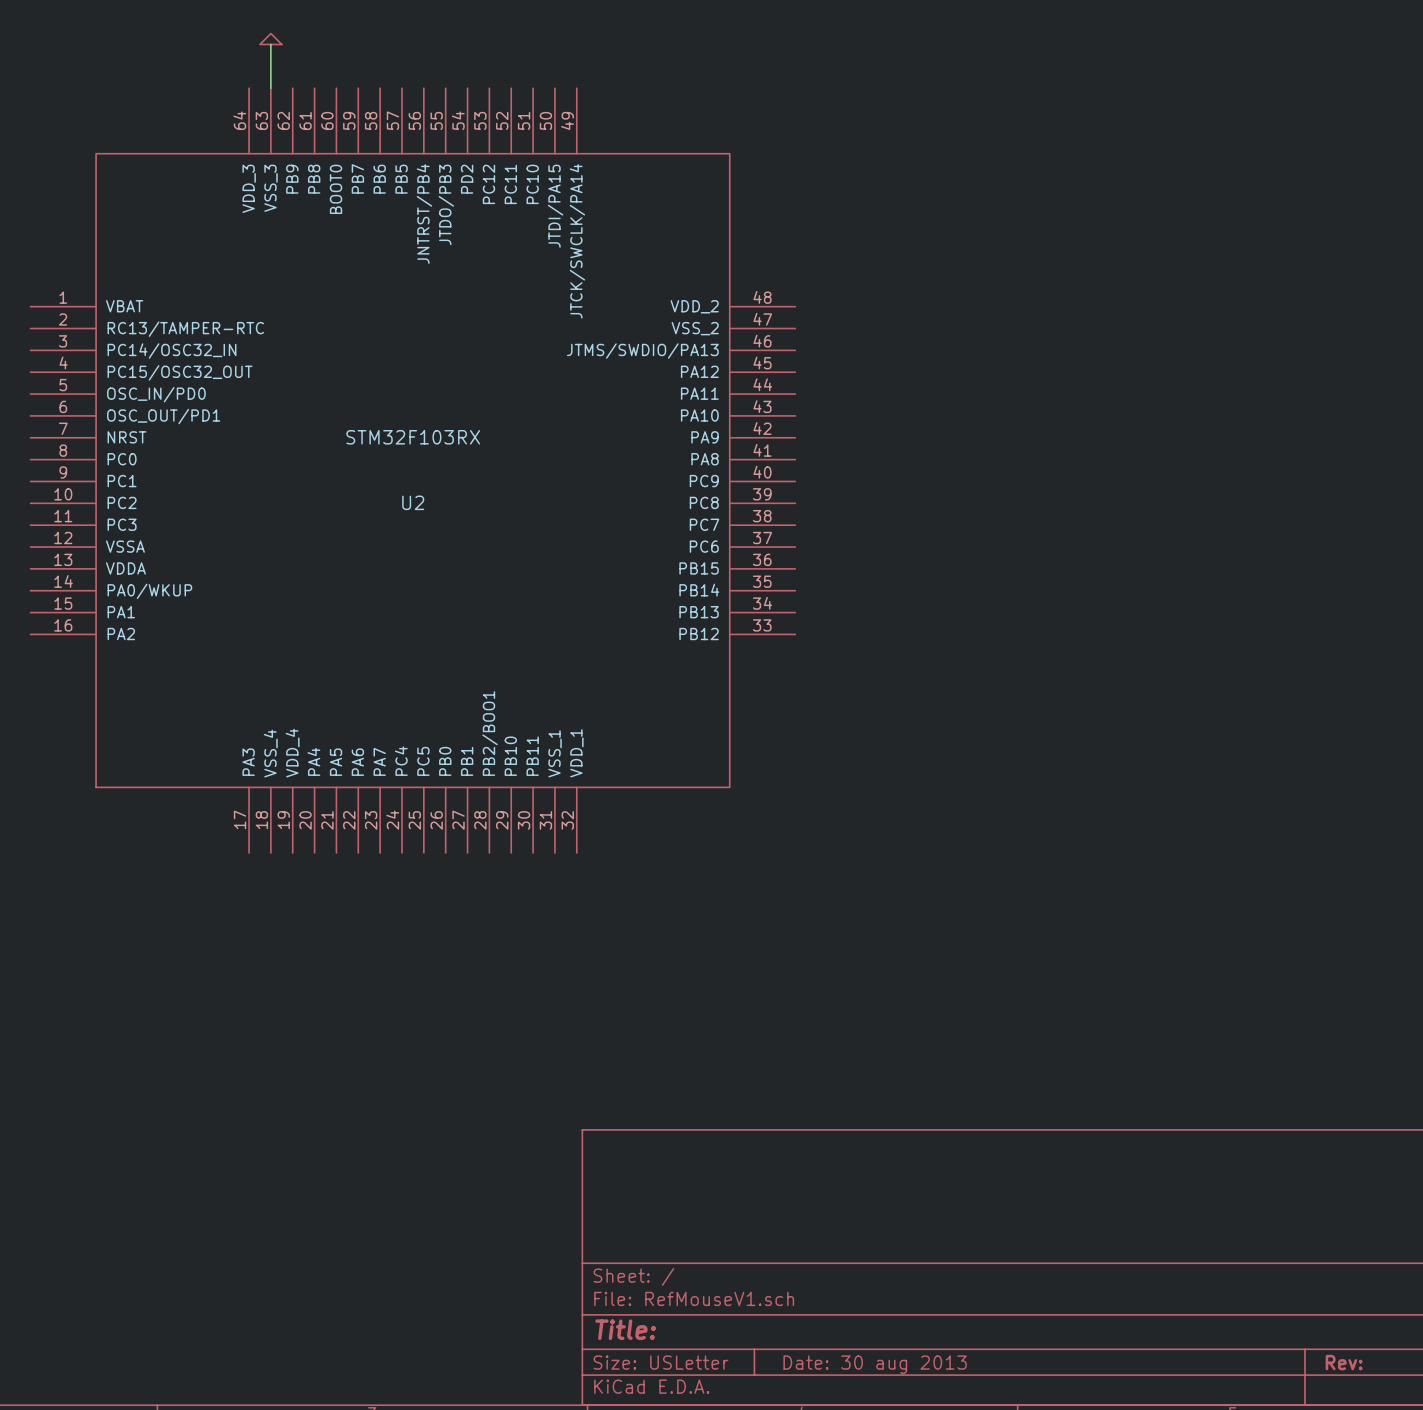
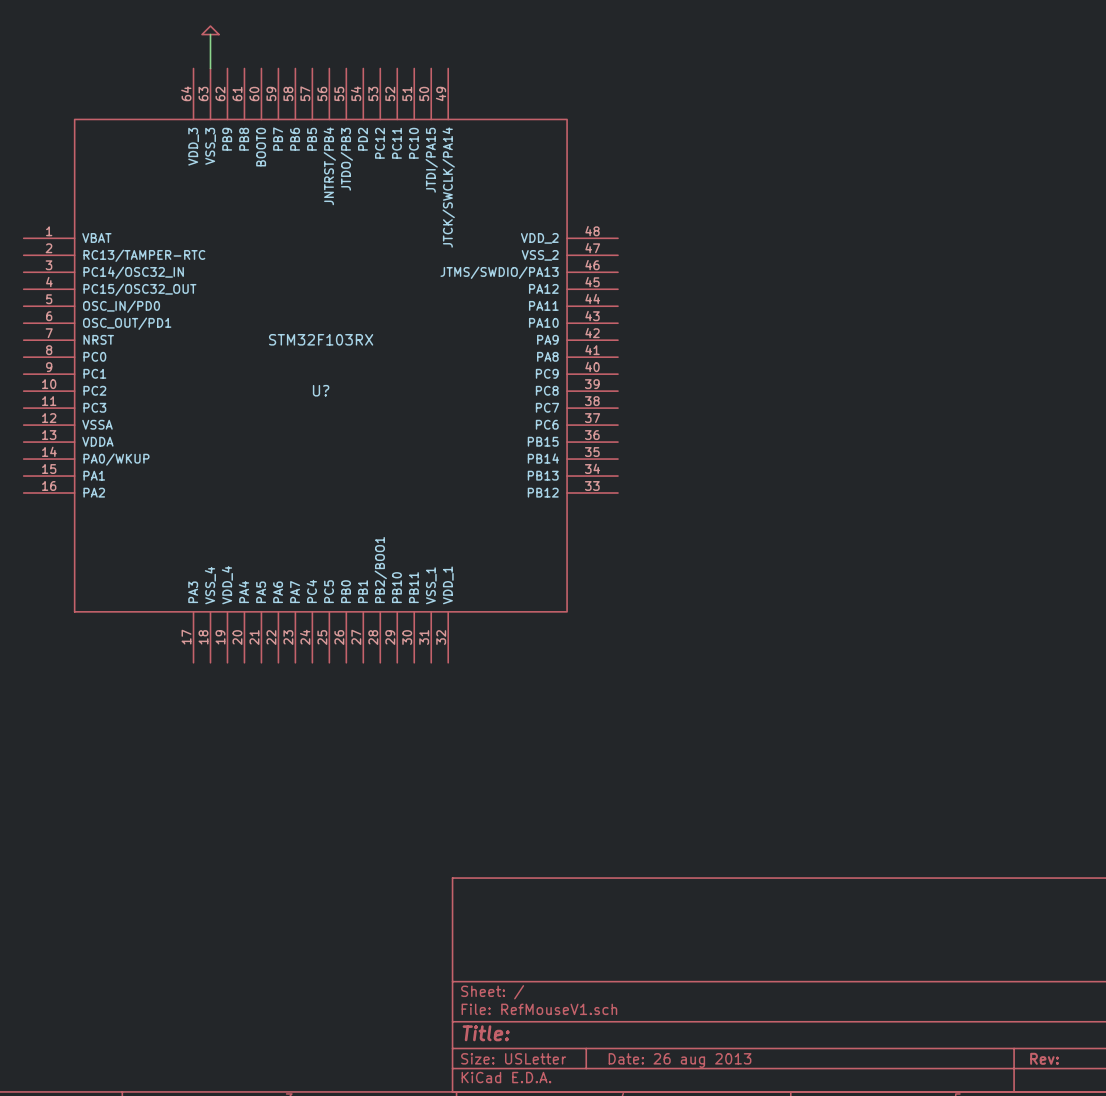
U2 name: U2 (413, 502) -> U? (321, 390)
title block: Date: 30 aug 2013 (875, 1364) -> Date: 26 aug 2013 (680, 1060)

